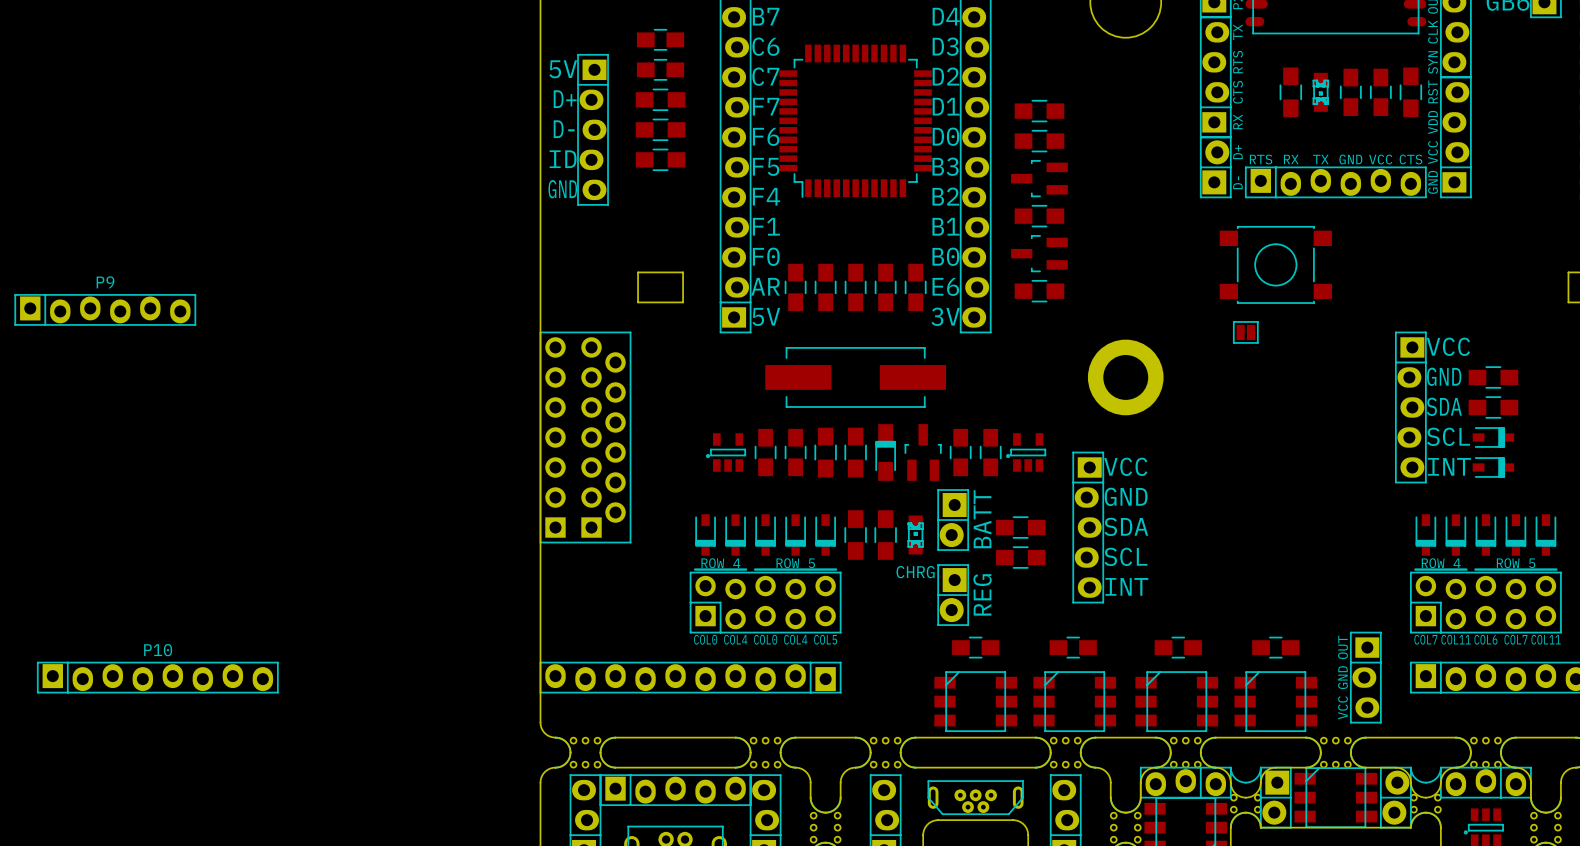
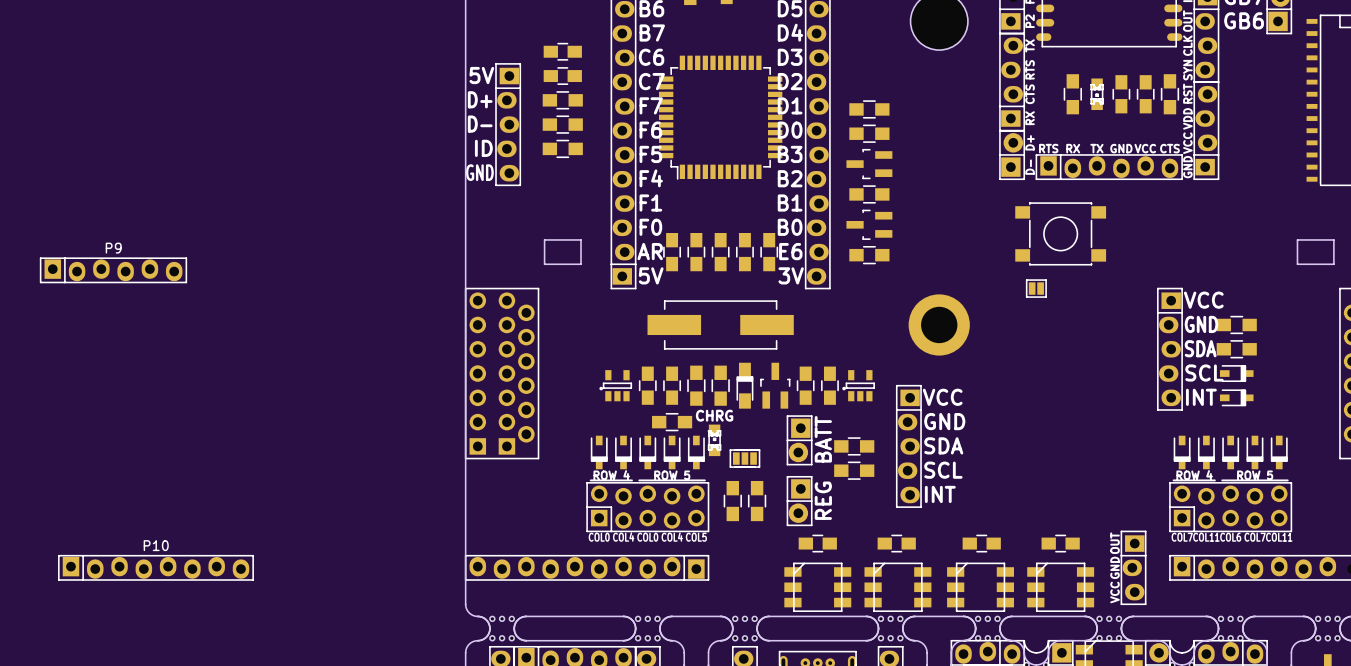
part: none -> (672, 422)
part footprint: [874, 510, 897, 560] -> [729, 449, 761, 468]
part: (855, 535) -> none
part position: (915, 535) -> (714, 440)
text position: CHRG (915, 572) -> CHRG (714, 415)
part: none -> (732, 501)
part: none -> (757, 501)

